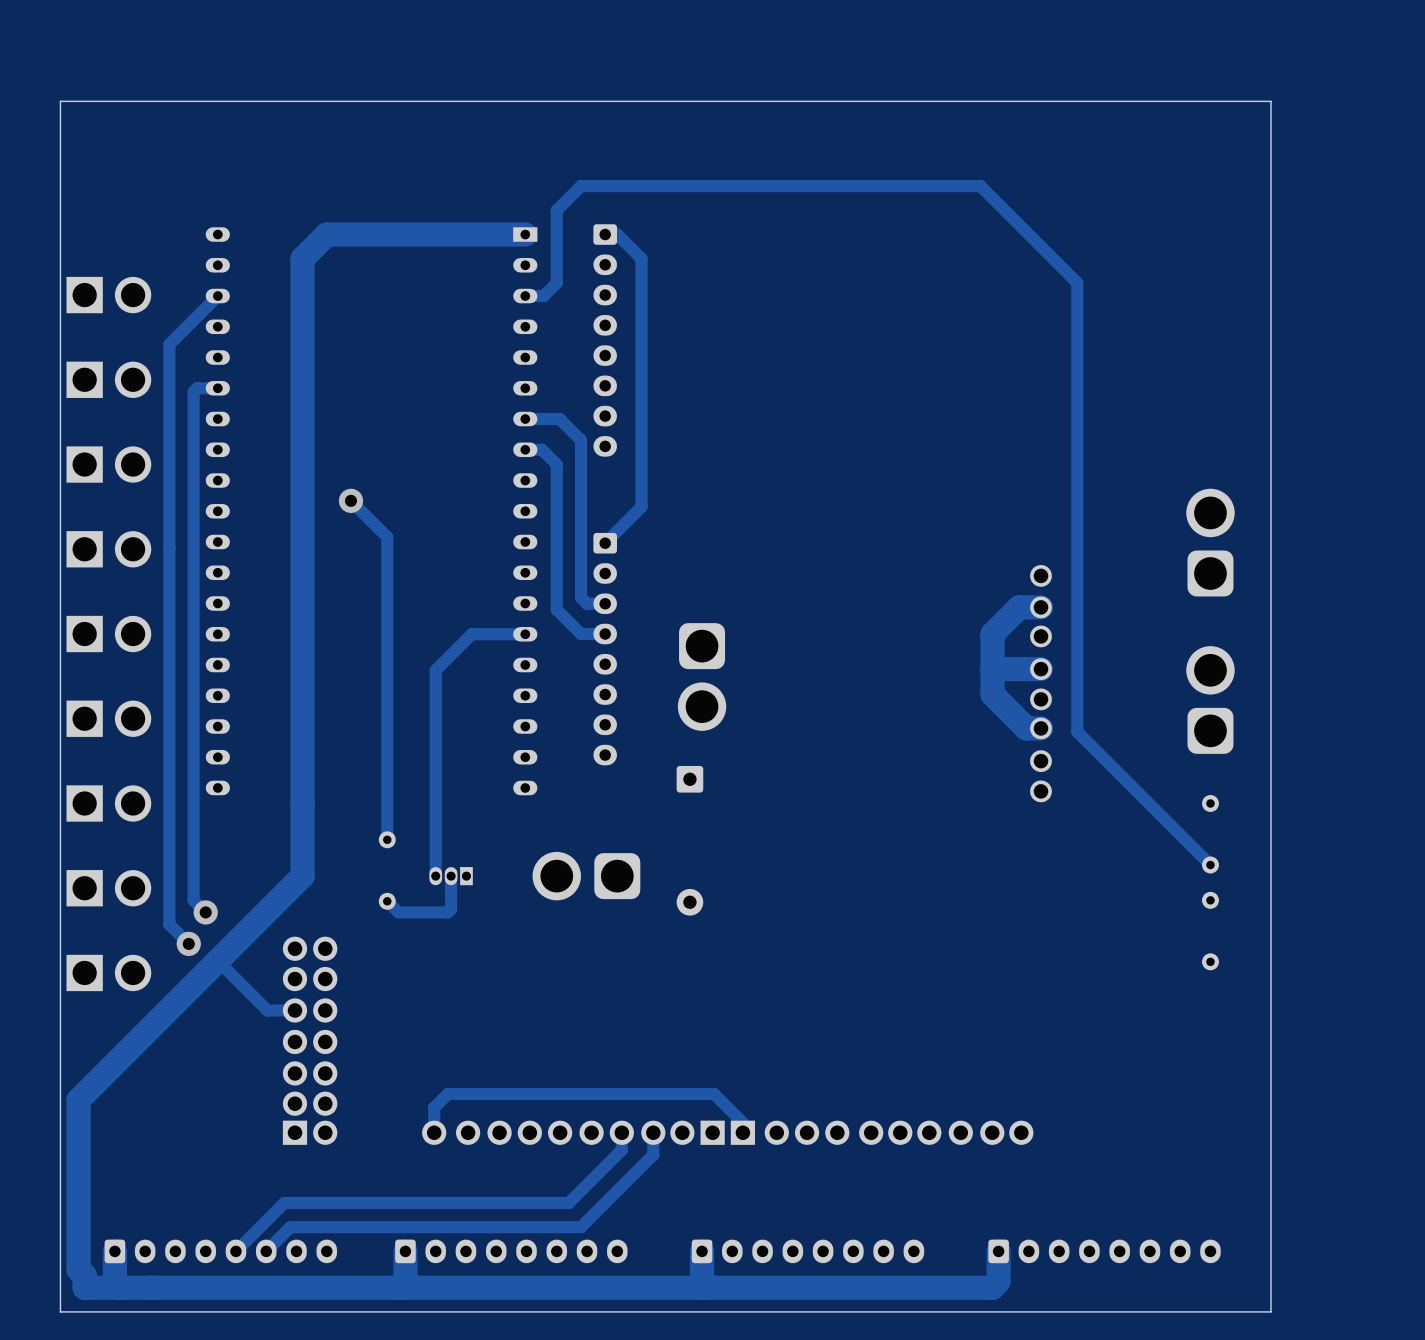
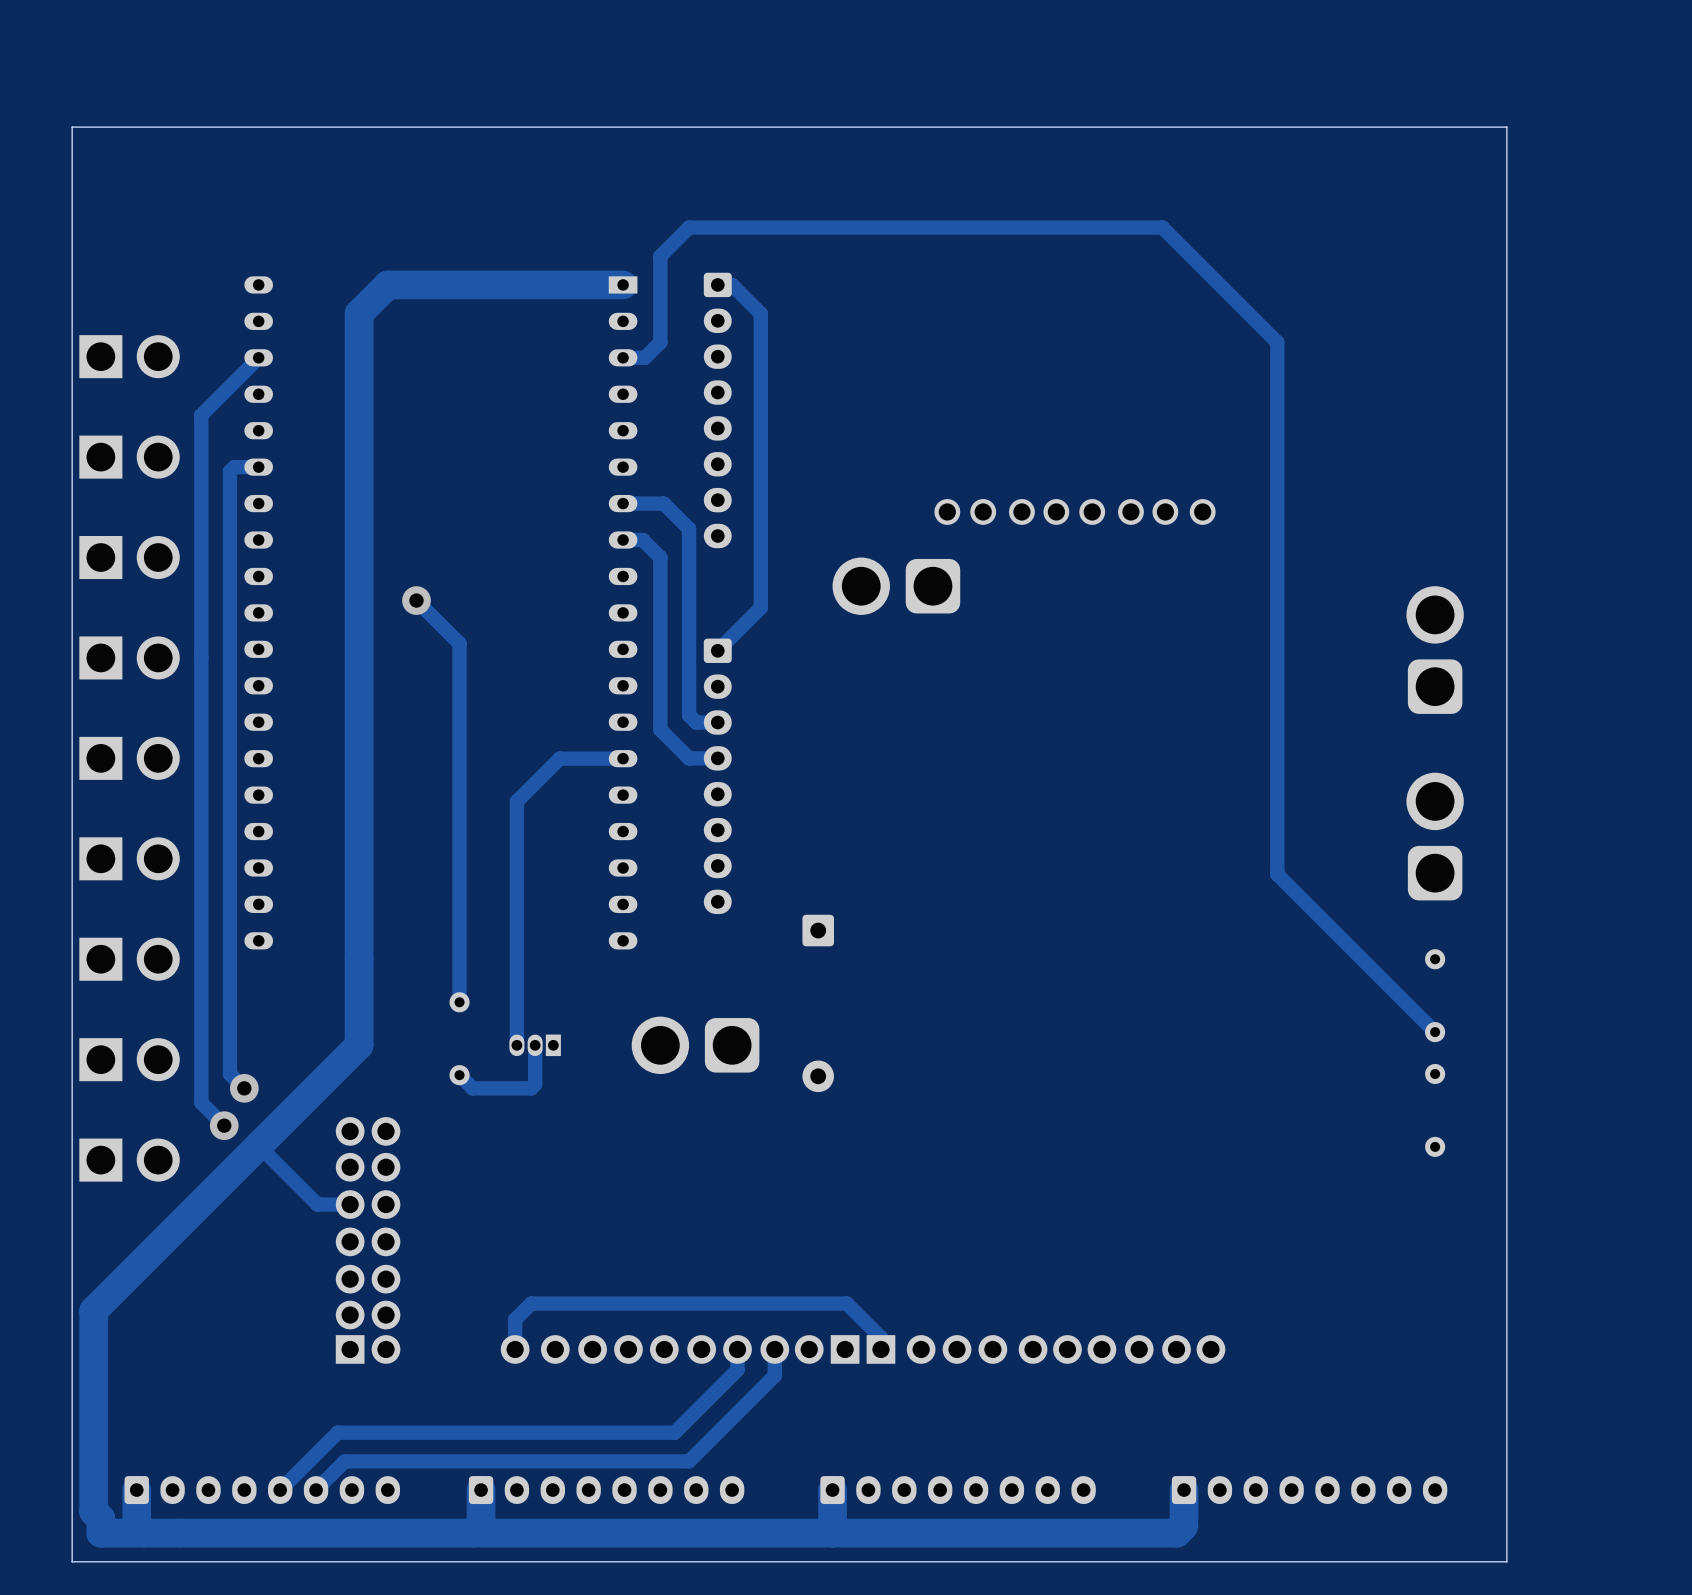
track: (1041, 607) (1019, 607) (992, 634) (992, 694) (1026, 728) (1041, 728) -> none
track: (1041, 669) (992, 670) -> none
part rotation: 0° (702, 676) -> 90° clockwise (896, 586)
part position: (702, 676) -> (896, 586)
part rotation: 0° (1041, 683) -> 90° clockwise (1075, 511)
part position: (1041, 683) -> (1075, 511)

